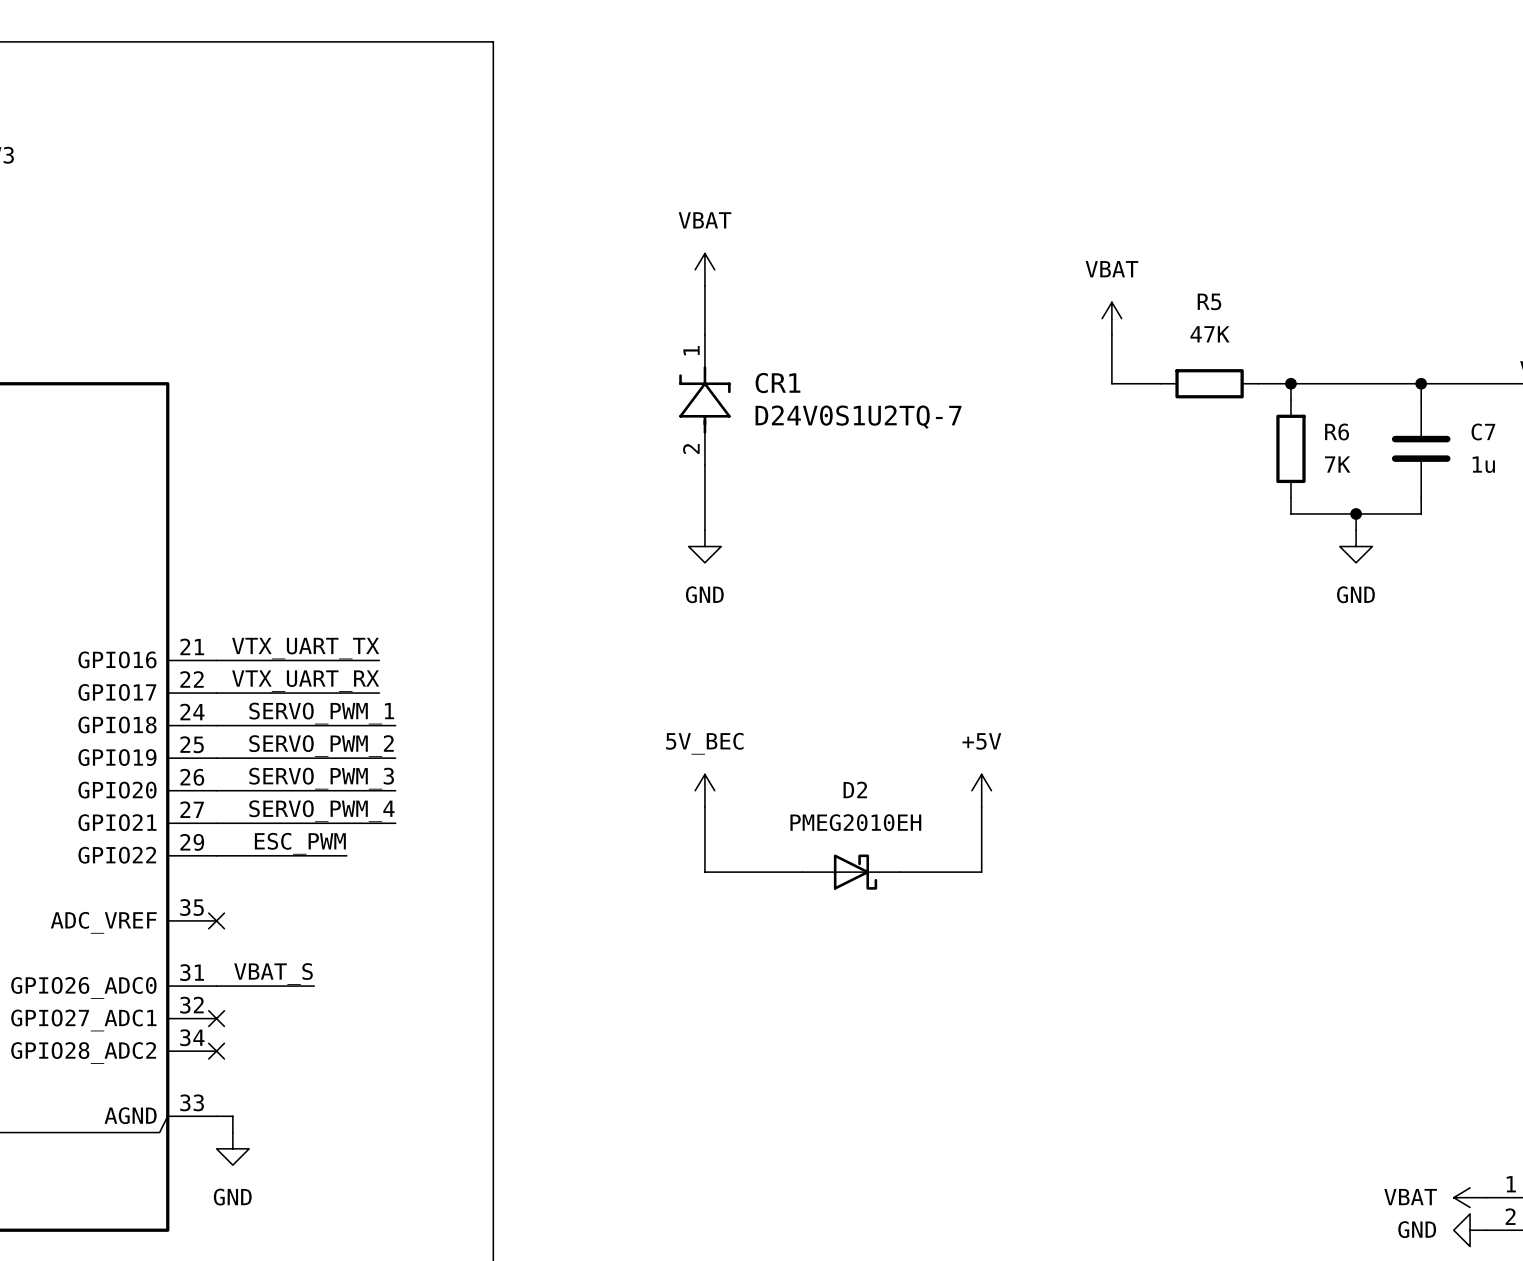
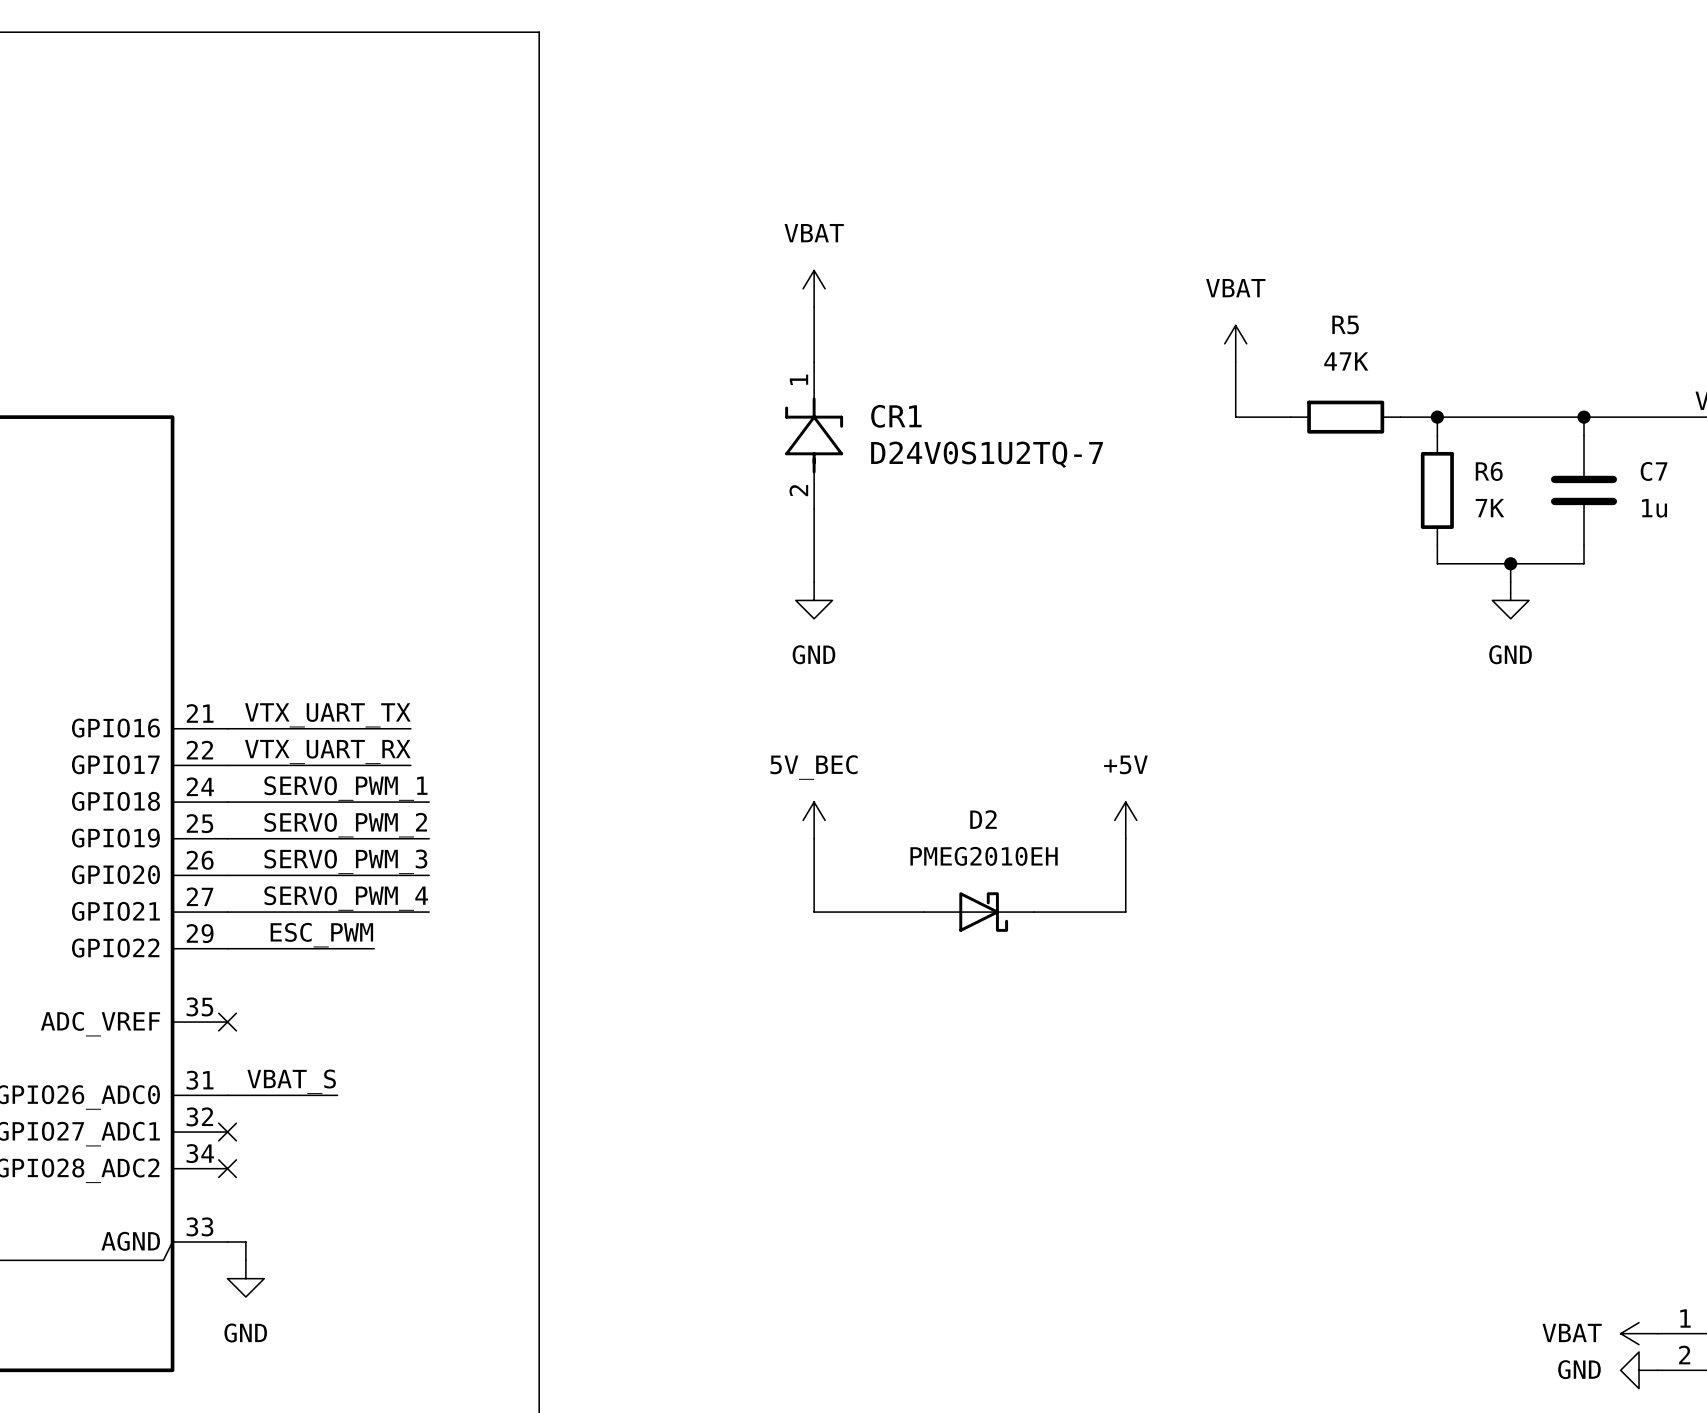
power symbol position: VBAT (704, 269) -> VBAT (814, 288)
wire: (704, 286) (704, 334) -> (814, 307) (814, 362)
CR1 position: (704, 400) -> (814, 435)
wire: (704, 465) (704, 530) -> (814, 508) (814, 582)
power symbol position: GND (704, 546) -> GND (814, 600)
power symbol position: 5V_BEC (704, 790) -> 5V_BEC (814, 820)
power symbol position: +5V (981, 790) -> +5V (1125, 820)
wire: (704, 806) (704, 872) (802, 872) -> (814, 838) (814, 912) (924, 912)
wire: (981, 806) (981, 872) (900, 872) -> (1125, 838) (1125, 912) (1034, 912)
D2 position: (851, 872) -> (979, 912)

